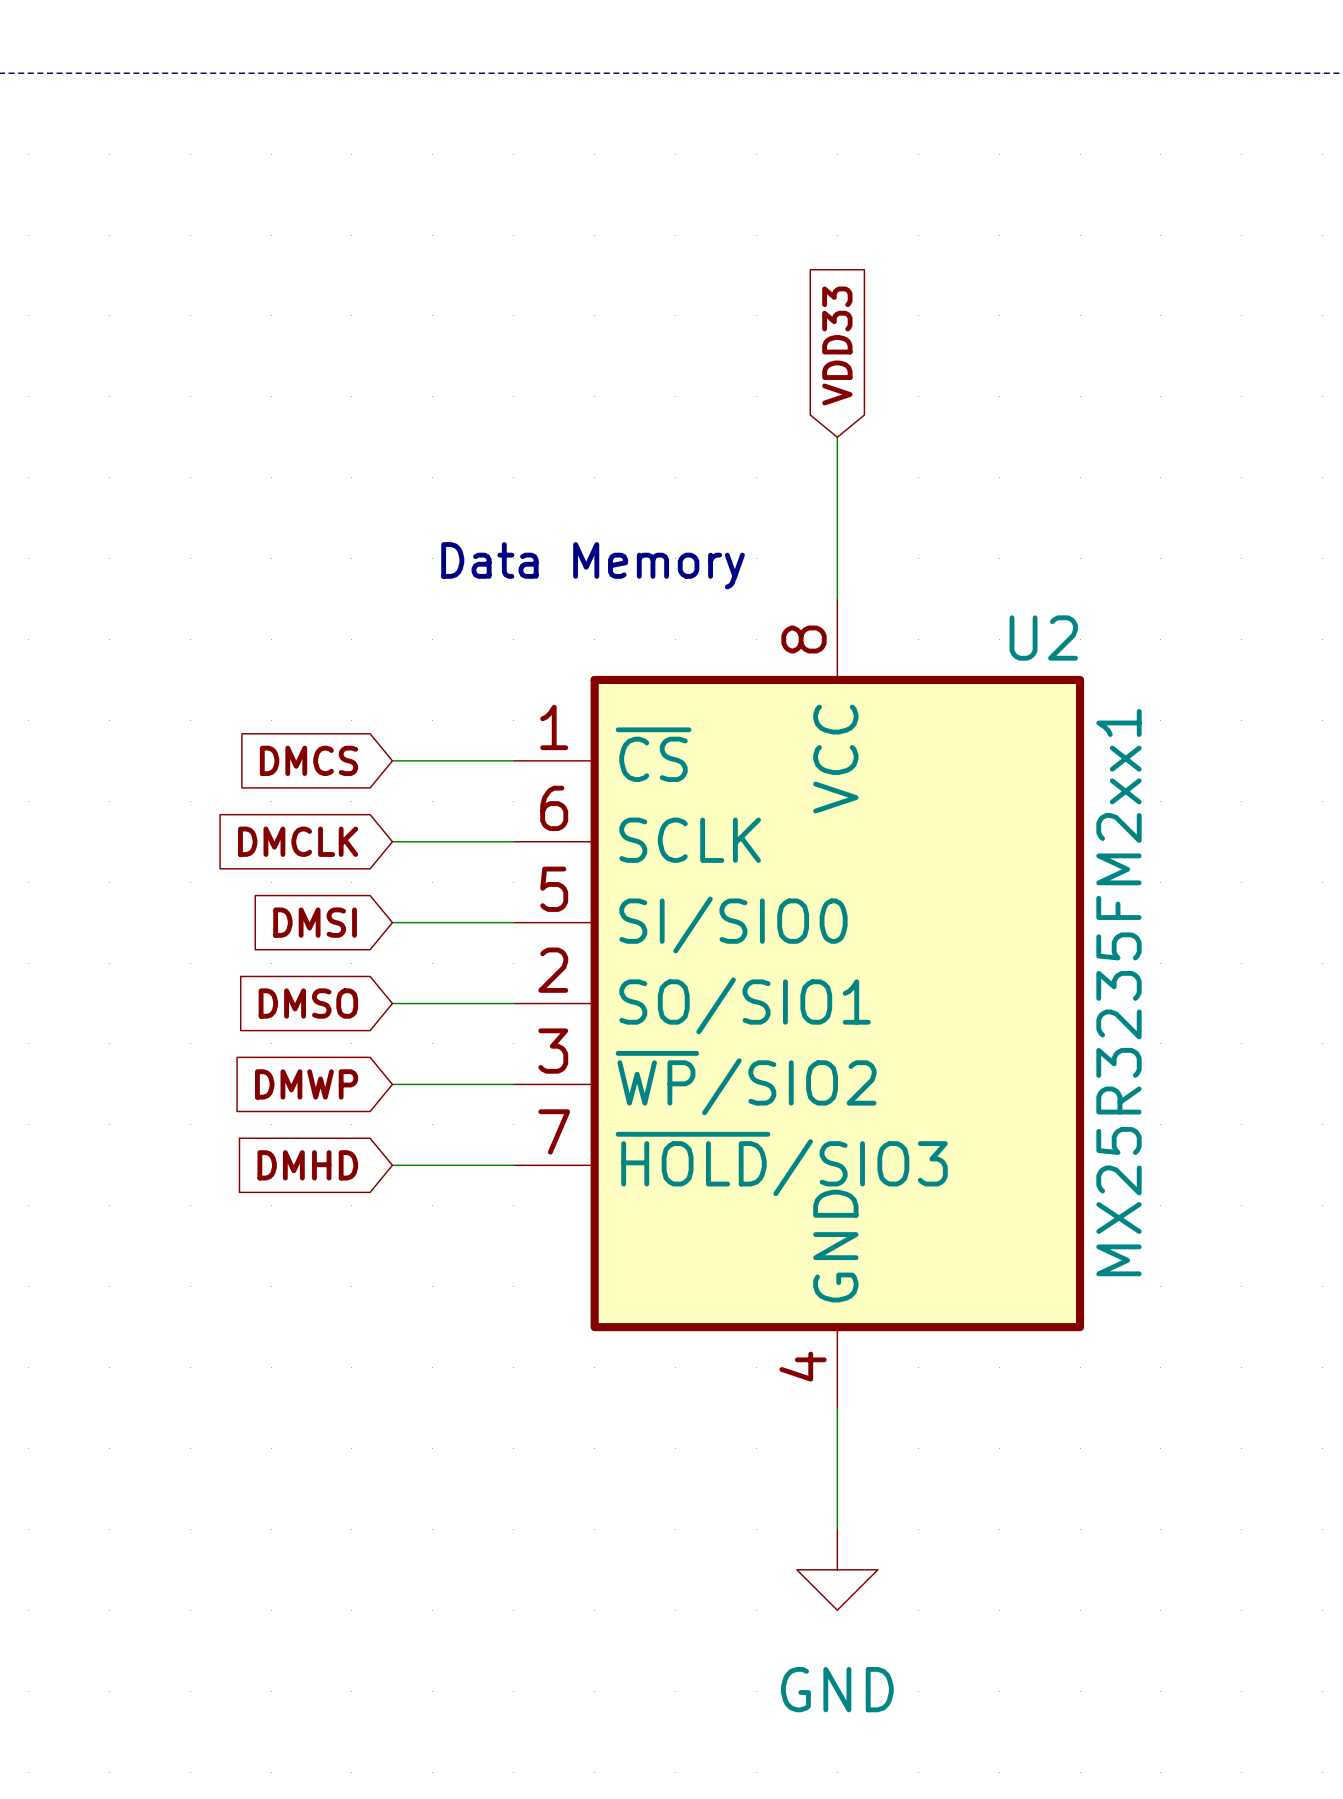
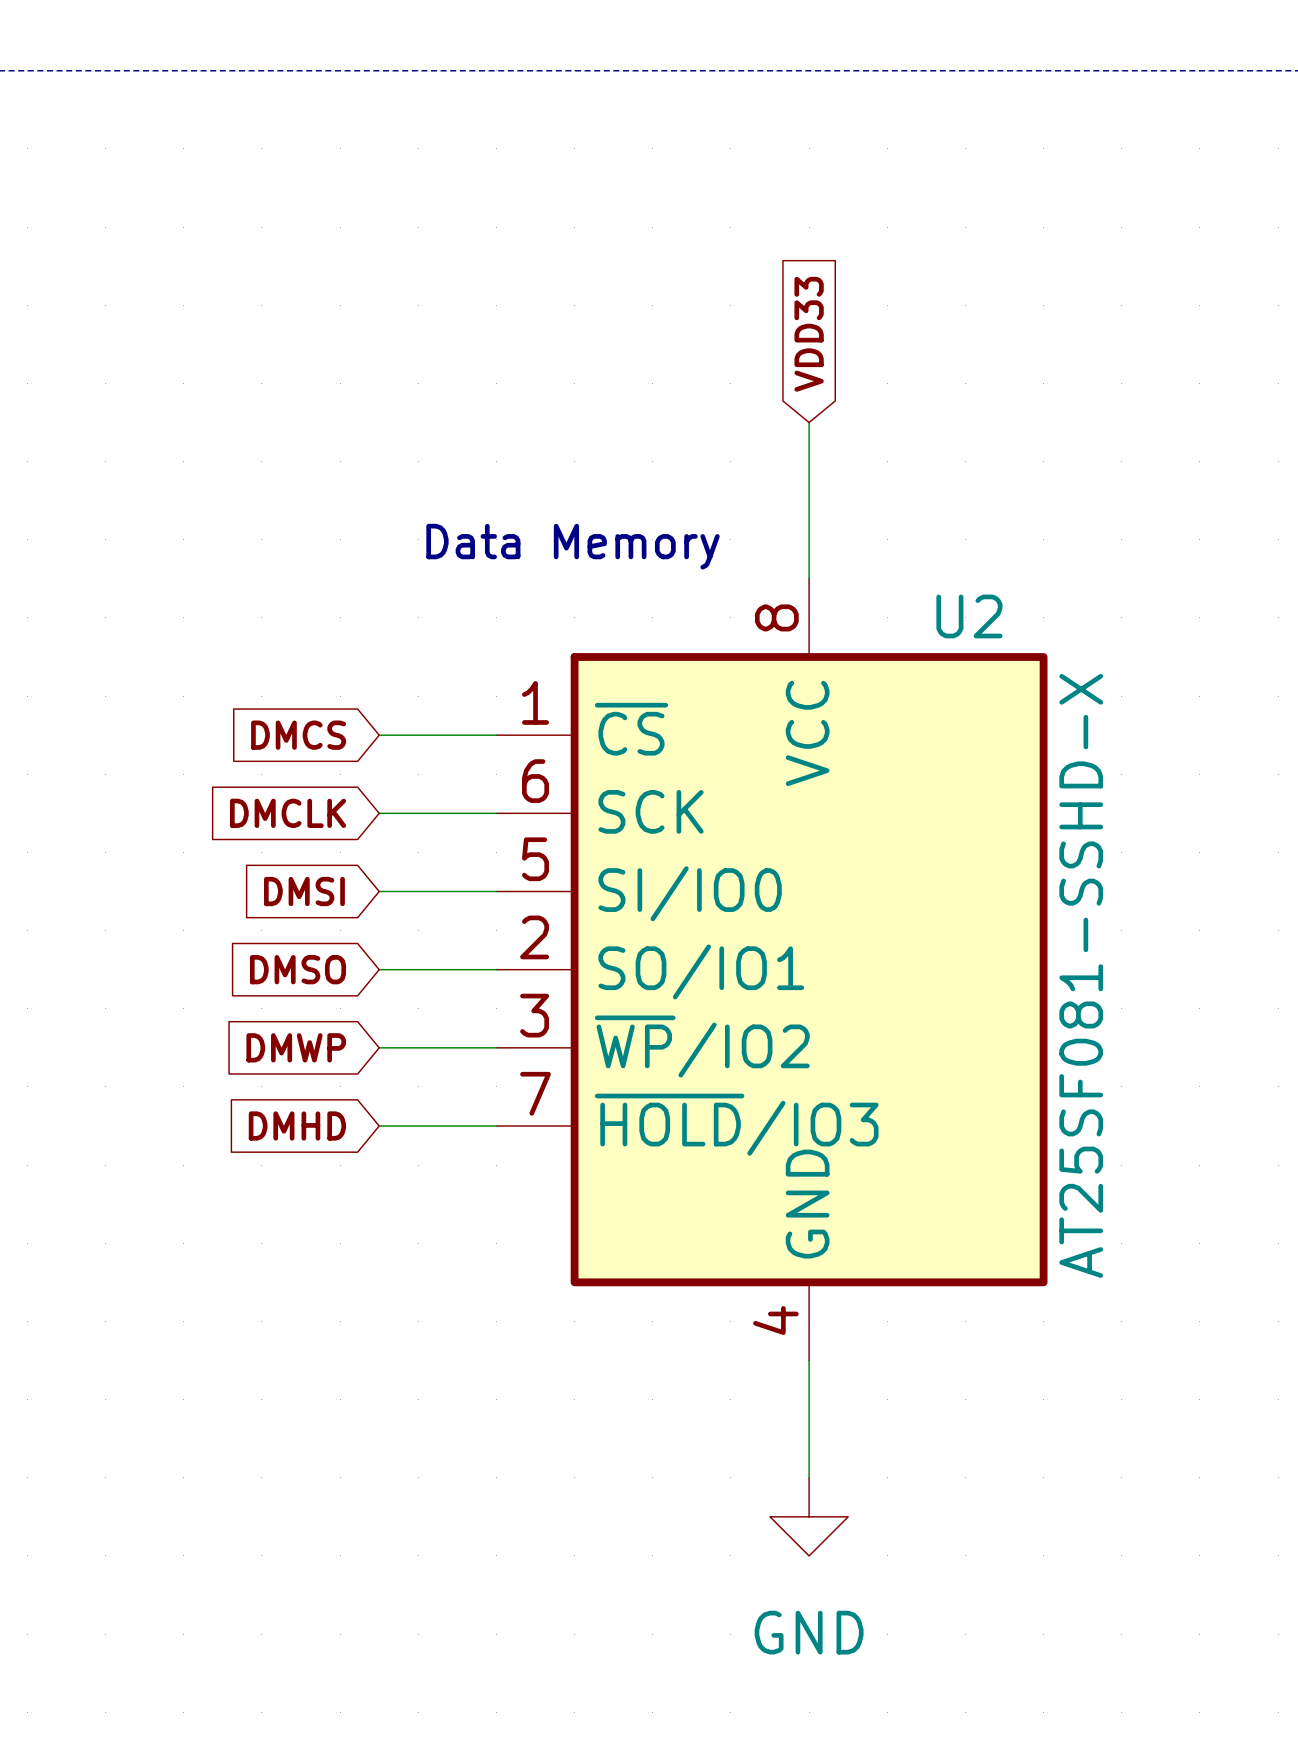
U2 name position: U2 (1043, 637) -> U2 (969, 616)
U2 pin name: SCLK (690, 840) -> SCK (651, 811)
U2 pin name: SI/SIO0 (733, 924) -> SI/IO0 (690, 893)
U2 value: MX25R3235FM2xx1 (1118, 992) -> AT25SF081-SSHD-X (1081, 975)
U2 pin name: SO/SIO1 (745, 1005) -> SO/IO1 (701, 971)
U2 pin name: ~{WP}/SIO2 (746, 1083) -> ~{WP}/IO2 (702, 1046)
U2 pin name: ~{HOLD}/SIO3 (781, 1163) -> ~{HOLD}/IO3 (736, 1124)

